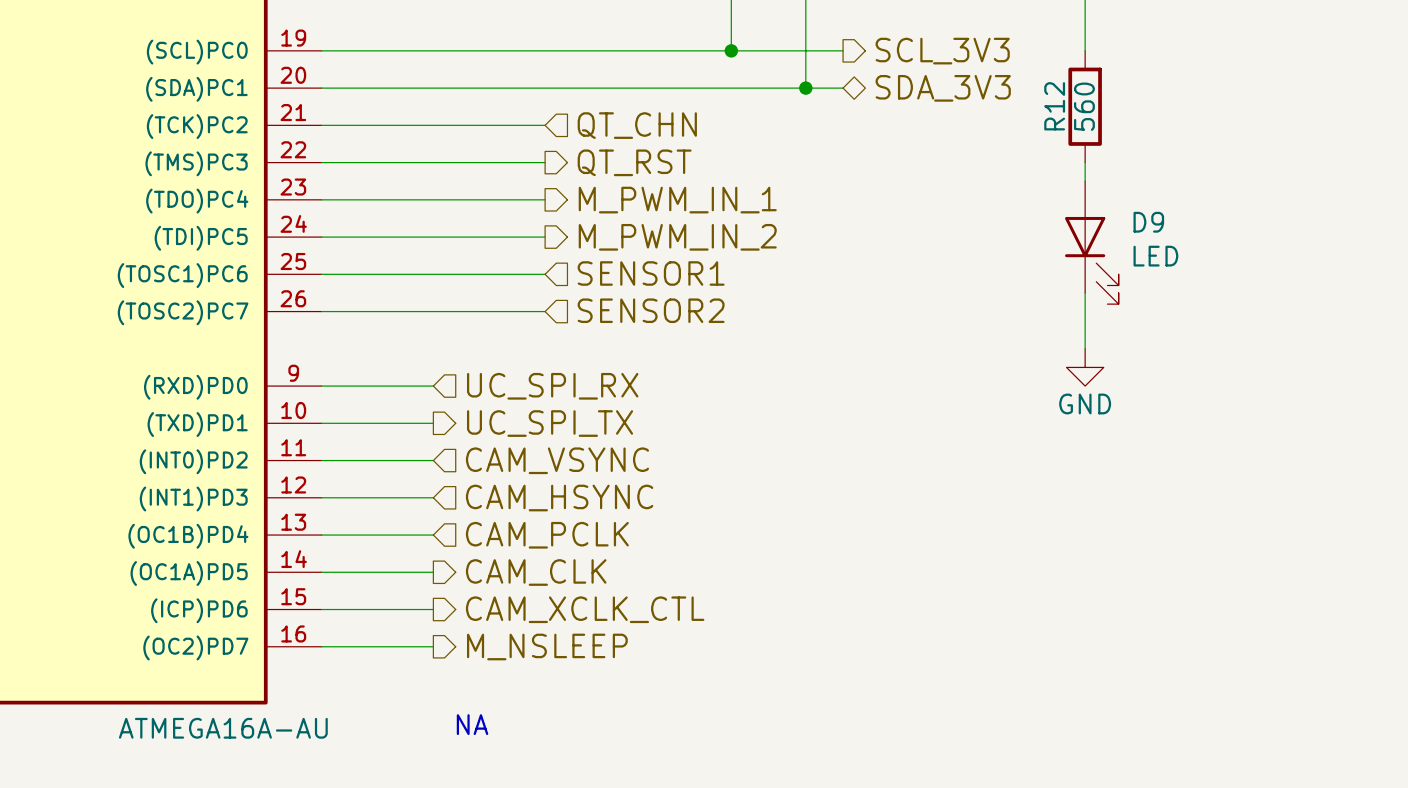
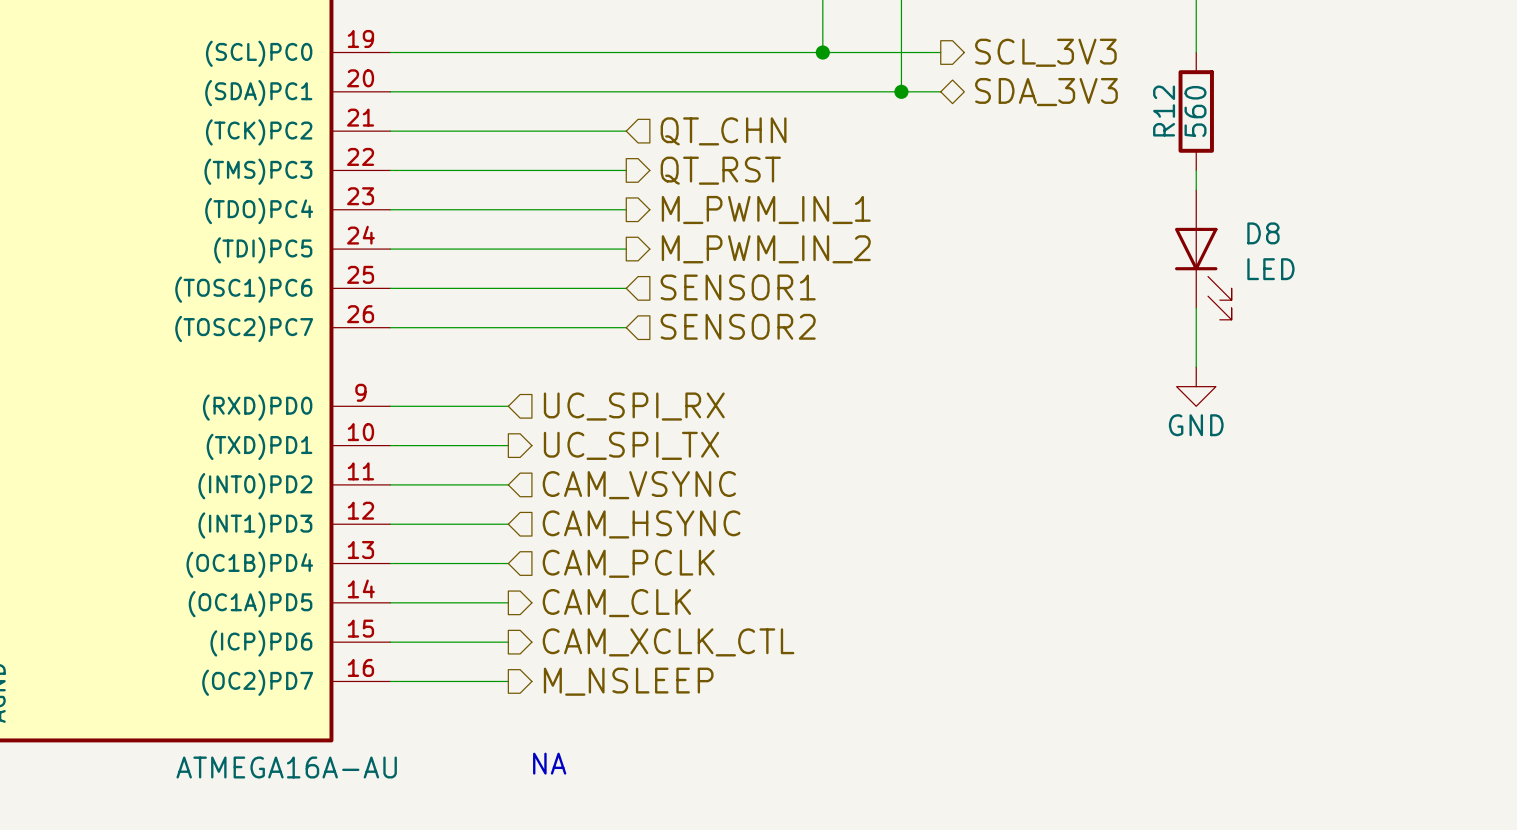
D9 name: D9 (1148, 222) -> D8 (1263, 233)

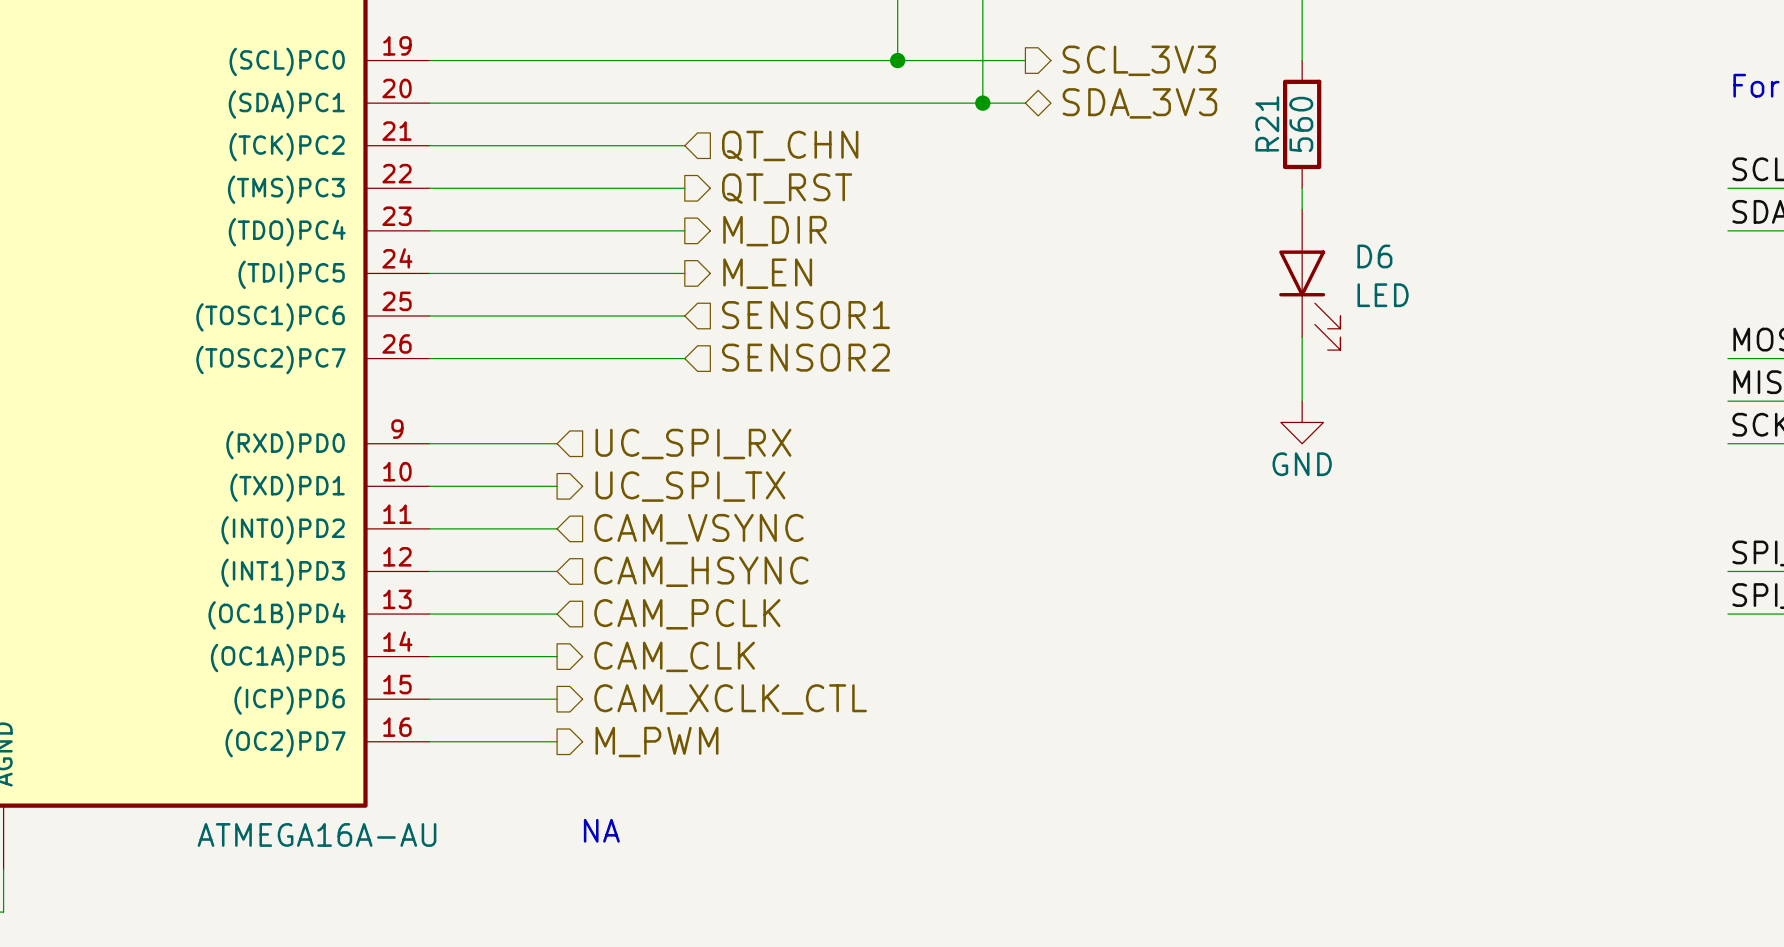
R12 name: R12 (1164, 111) -> R21 (1267, 123)
hierarchical label: M_PWM_IN_1 (766, 210) -> M_DIR (774, 231)
D8 name: D8 (1263, 233) -> D6 (1374, 256)
hierarchical label: M_PWM_IN_2 (766, 249) -> M_EN (767, 273)
hierarchical label: M_NSLEEP (628, 681) -> M_PWM (656, 742)

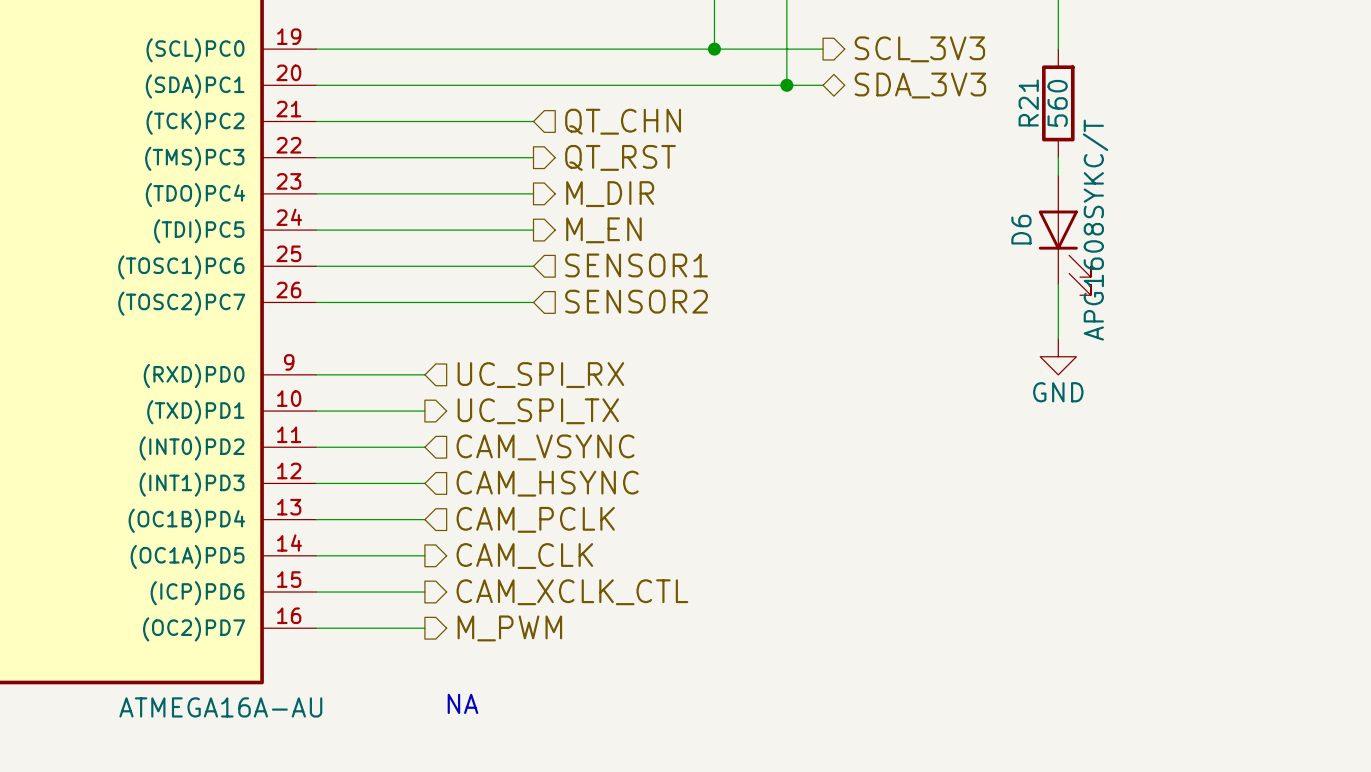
D6 name rotation: 0° (1374, 256) -> 90° counterclockwise (1021, 229)
D6 name position: D6 (1374, 256) -> D6 (1021, 229)
D6 value: LED (1383, 295) -> APG1608SYKC/T (1095, 230)

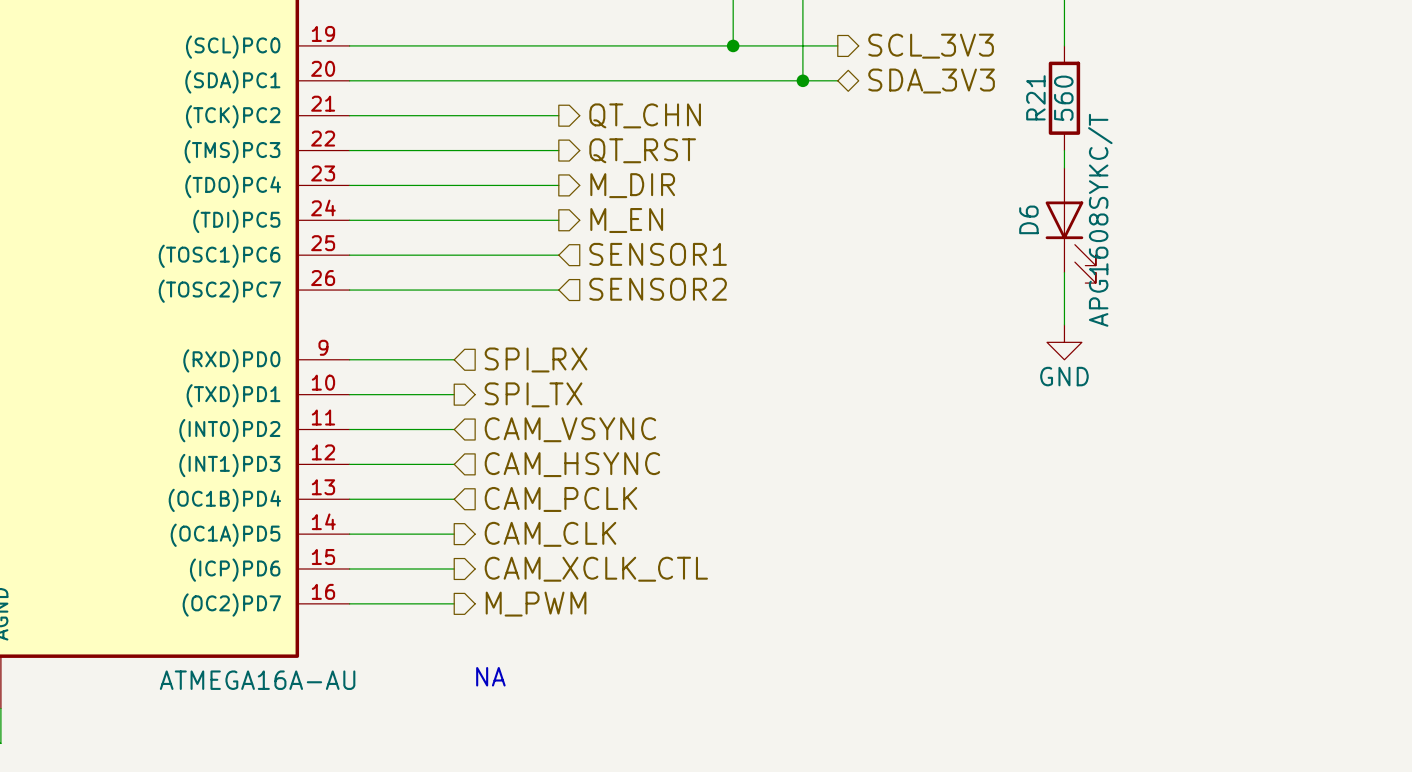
hierarchical label shape: input (623, 121) -> output (645, 115)
hierarchical label: UC_SPI_RX (540, 375) -> SPI_RX (536, 359)
hierarchical label: UC_SPI_TX (538, 411) -> SPI_TX (533, 394)

